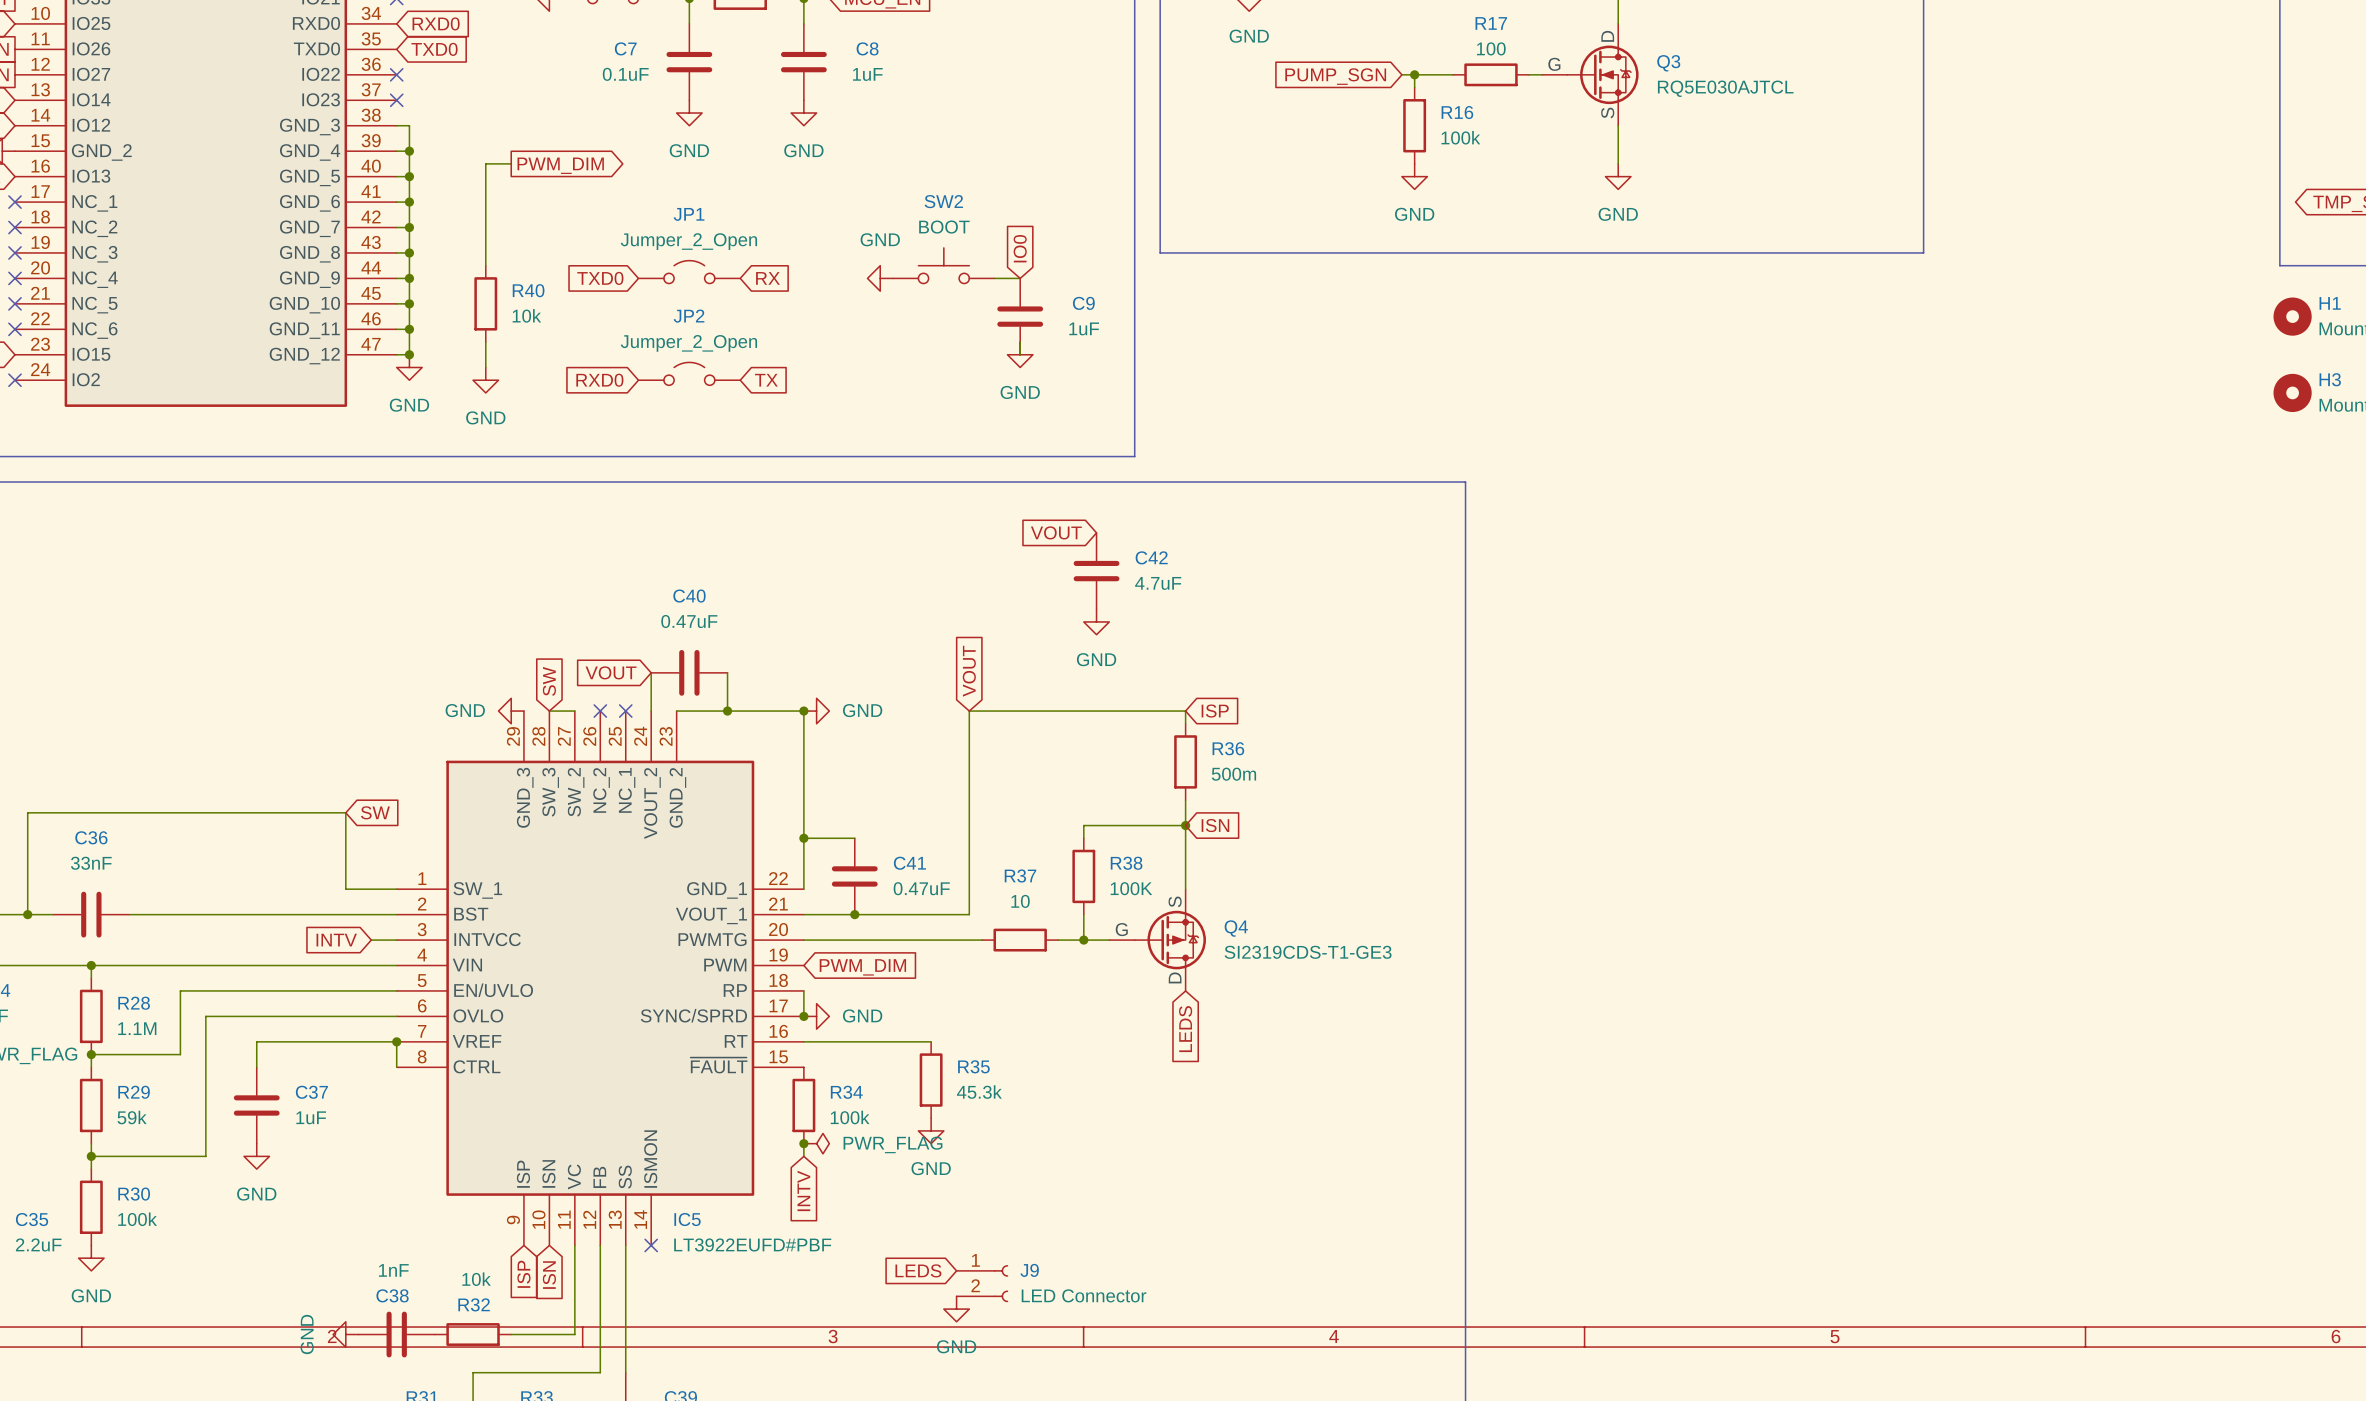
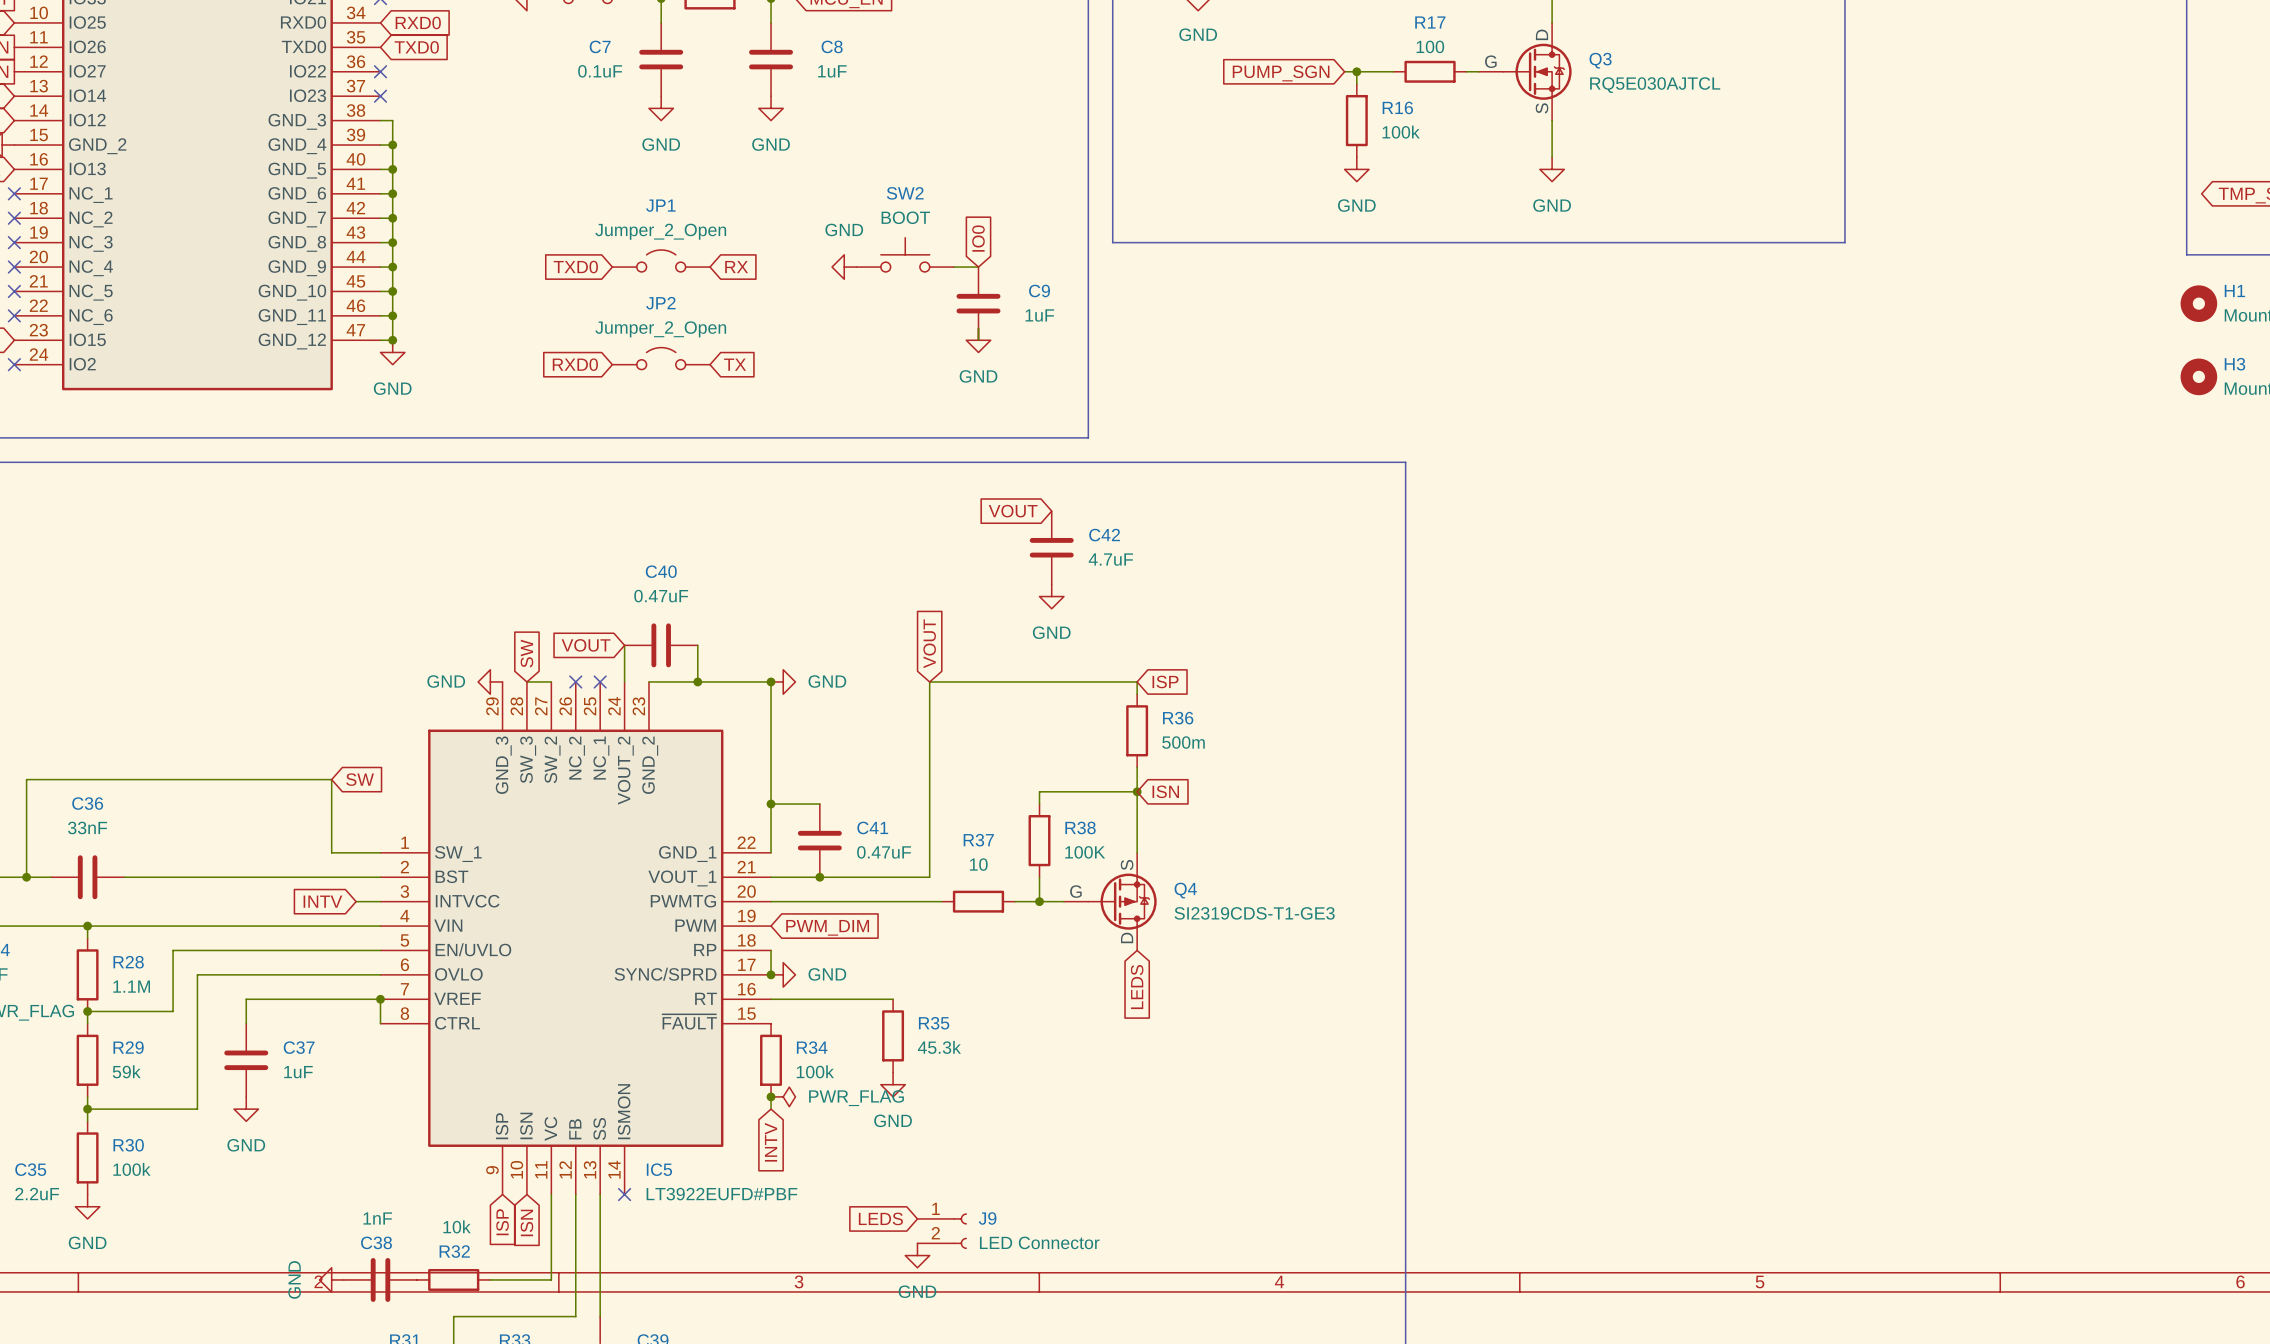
wire: (511, 163) (485, 163) (485, 265) -> none
global label: PWM_DIM (560, 165) -> none
R40: 10k (485, 303) -> none
wire: (485, 342) (485, 367) -> none
power symbol: GND (485, 380) -> none

